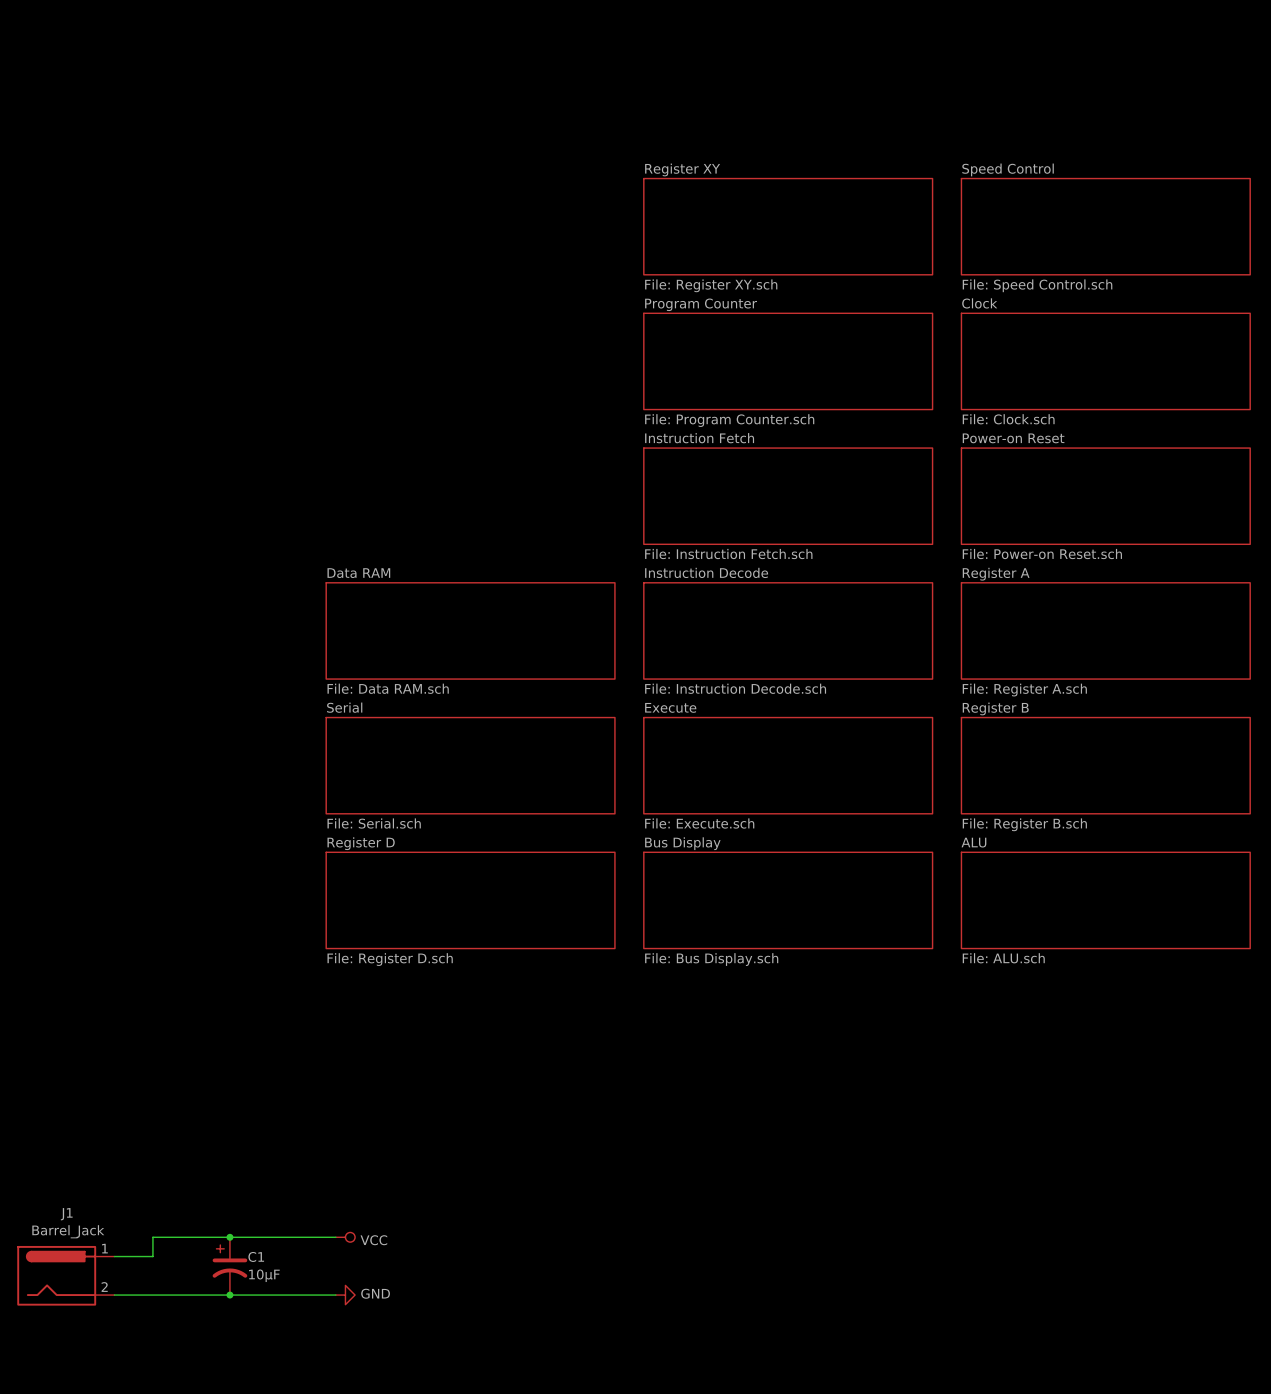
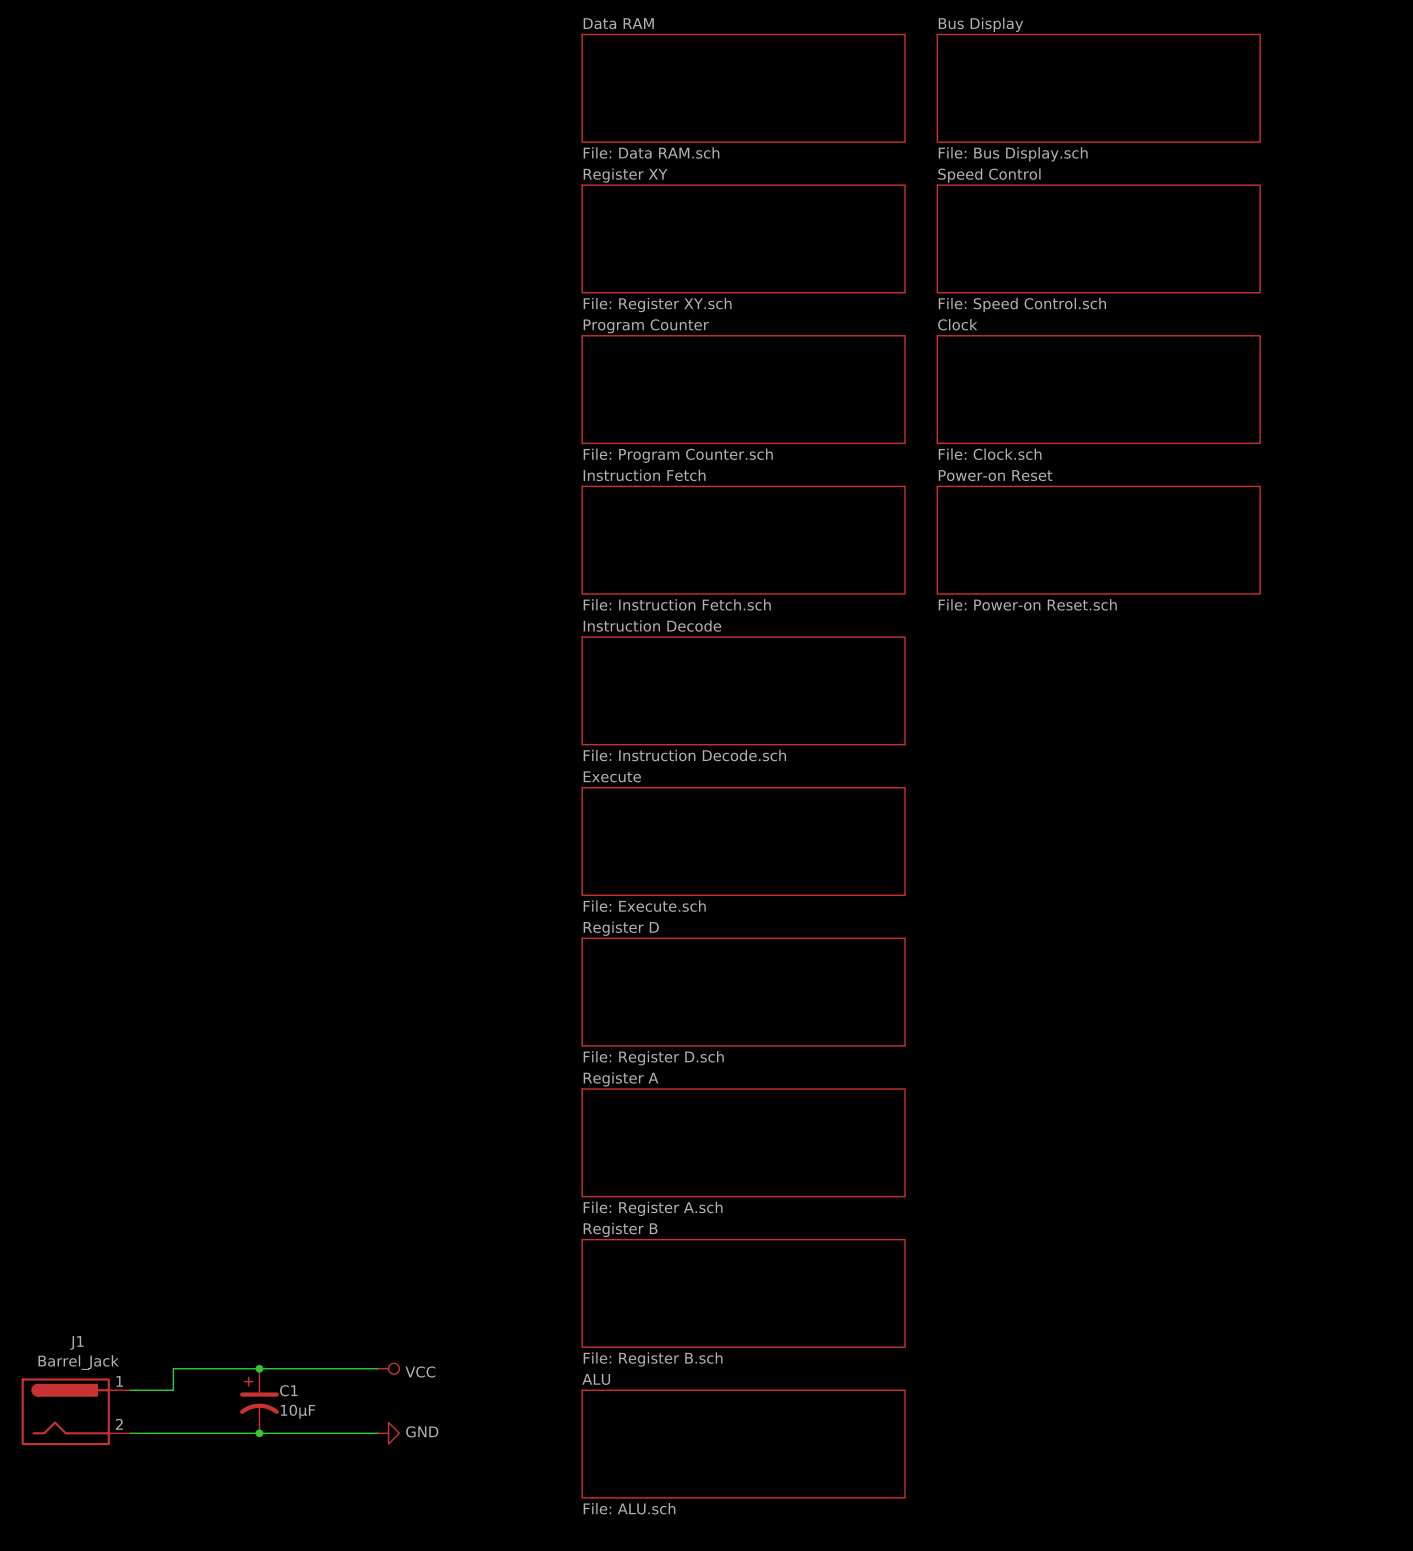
sheet Data RAM: none -> File: Data RAM.sch (743, 88)
sheet Bus Display: none -> File: Bus Display.sch (1098, 88)
sheet Register XY position: (788, 226) -> (743, 238)
sheet Speed Control position: (1105, 226) -> (1098, 238)
sheet Program Counter position: (788, 361) -> (743, 389)
sheet Clock position: (1105, 361) -> (1098, 389)
sheet Instruction Fetch position: (788, 496) -> (743, 540)
sheet Power-on Reset position: (1105, 496) -> (1098, 540)
sheet Data RAM: File: Data RAM.sch (470, 630) -> none
sheet Instruction Decode position: (788, 630) -> (743, 690)
sheet Register A: File: Register A.sch (1105, 630) -> none
sheet Serial: File: Serial.sch (470, 765) -> none
sheet Execute position: (788, 765) -> (743, 841)
sheet Register B: File: Register B.sch (1105, 765) -> none
sheet Register D: File: Register D.sch (470, 900) -> none
sheet Register D: none -> File: Register D.sch (743, 992)
sheet Bus Display: File: Bus Display.sch (788, 900) -> none
sheet ALU: File: ALU.sch (1105, 900) -> none
sheet Register A: none -> File: Register A.sch (743, 1142)
sheet Register B: none -> File: Register B.sch (743, 1293)
sheet ALU: none -> File: ALU.sch (743, 1444)

